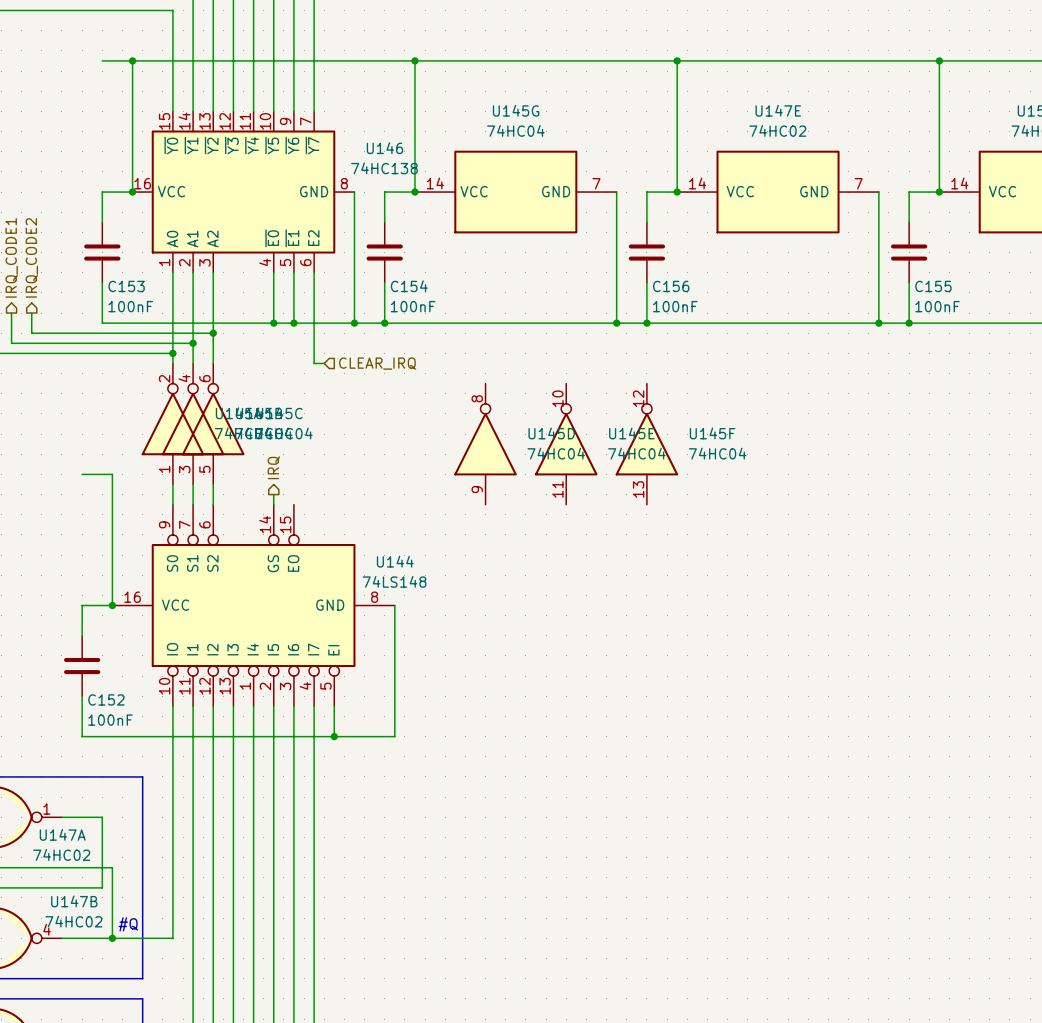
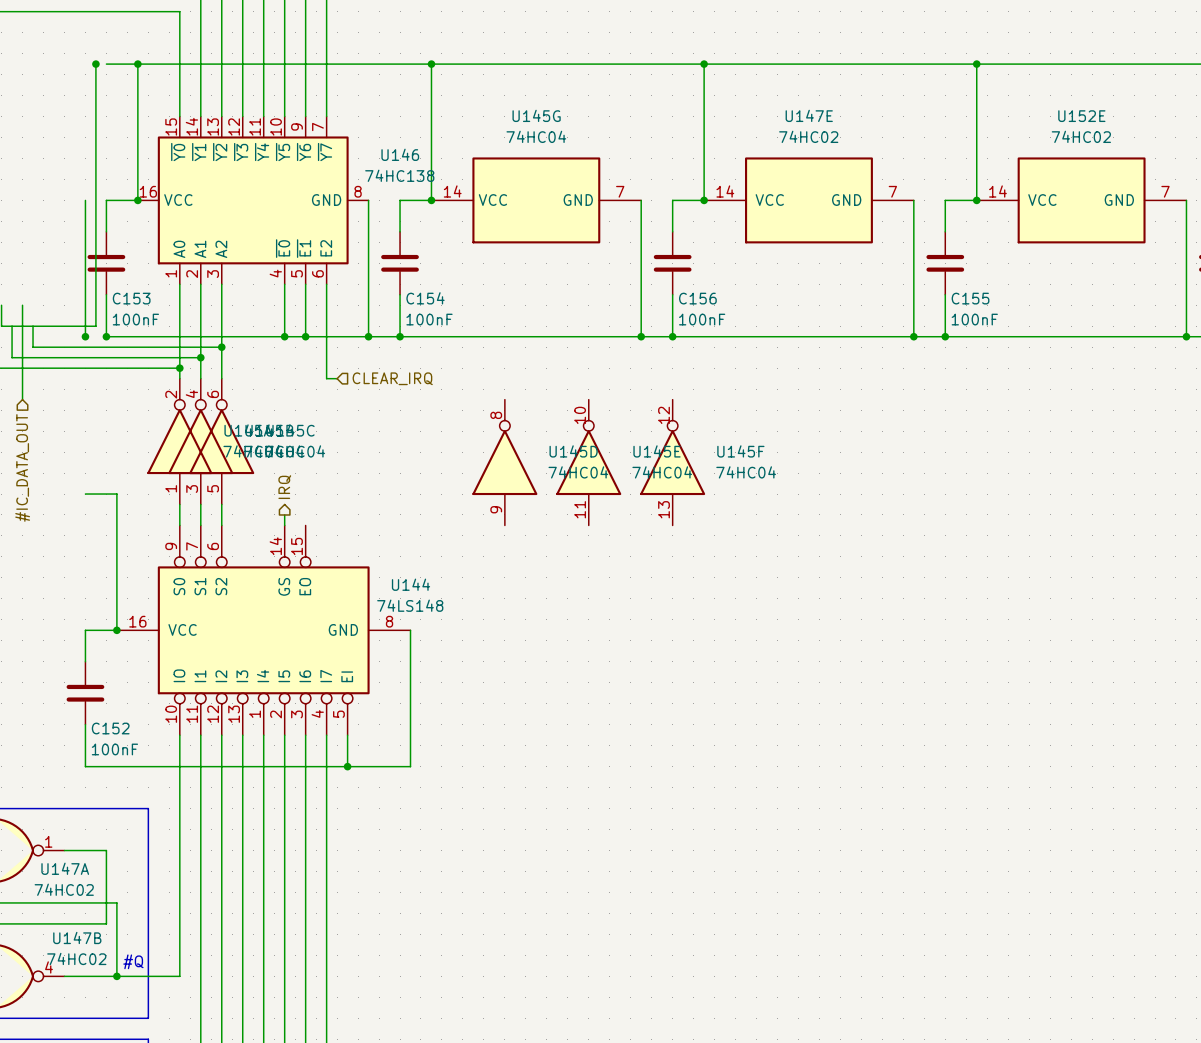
wire: none -> (95, 64) (95, 326) (1, 326) (1, 305)
junction: none -> (95, 64)
wire: none -> (85, 200) (85, 336)
hierarchical label: IRQ_CODE1 (11, 257) -> none
hierarchical label: IRQ_CODE2 (31, 257) -> none
wire: none -> (22, 305) (22, 399)
junction: none -> (85, 336)
junction: none -> (106, 336)
hierarchical label: none -> #IC_DATA_OUT (22, 467)

